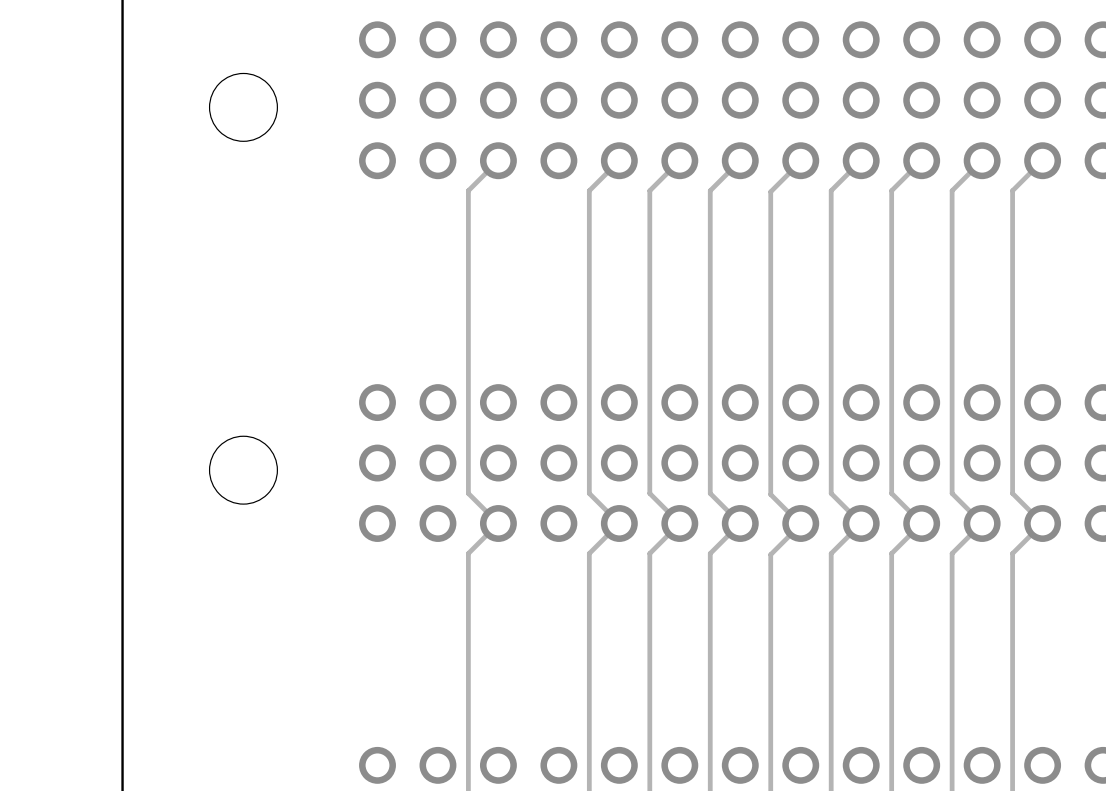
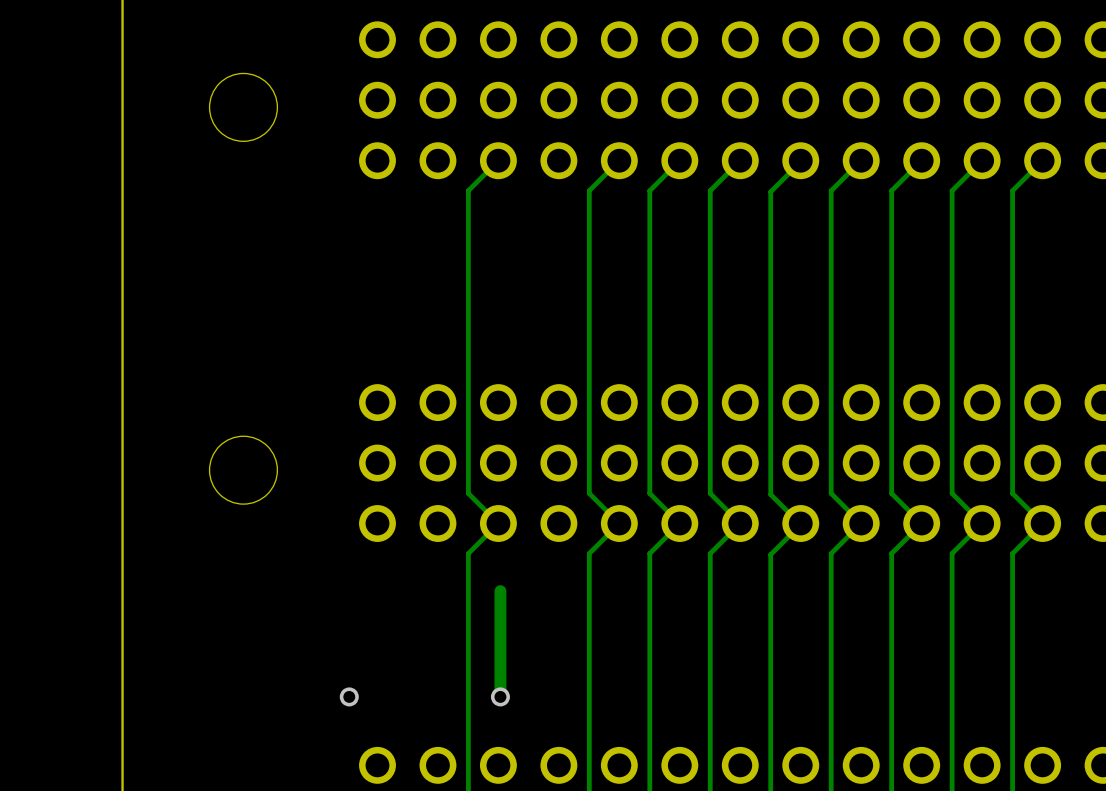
track: none -> (500, 591) (500, 696)
via: none -> (349, 696)
via: none -> (500, 696)

